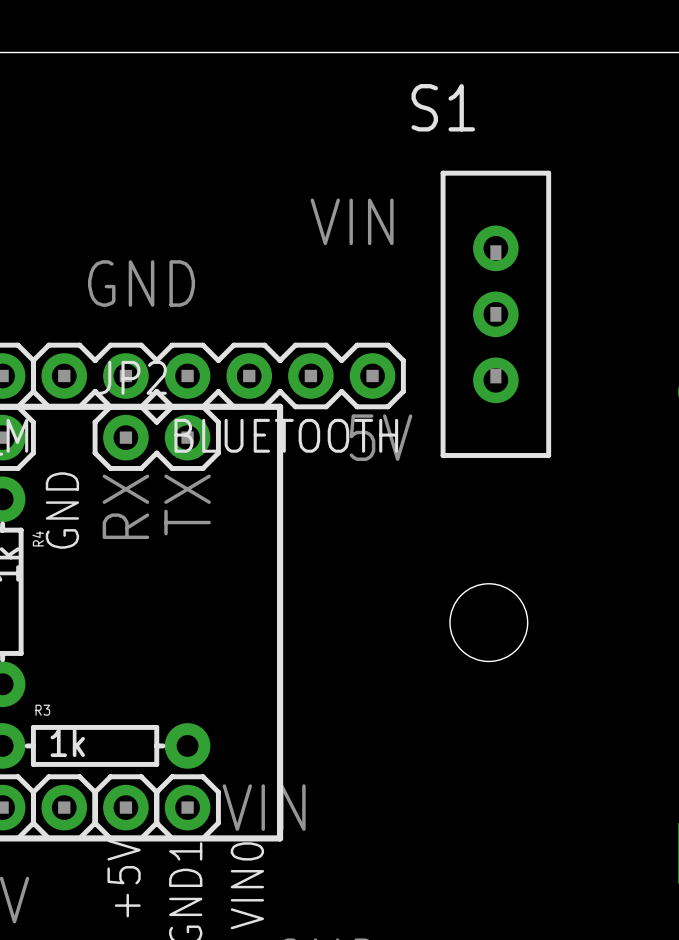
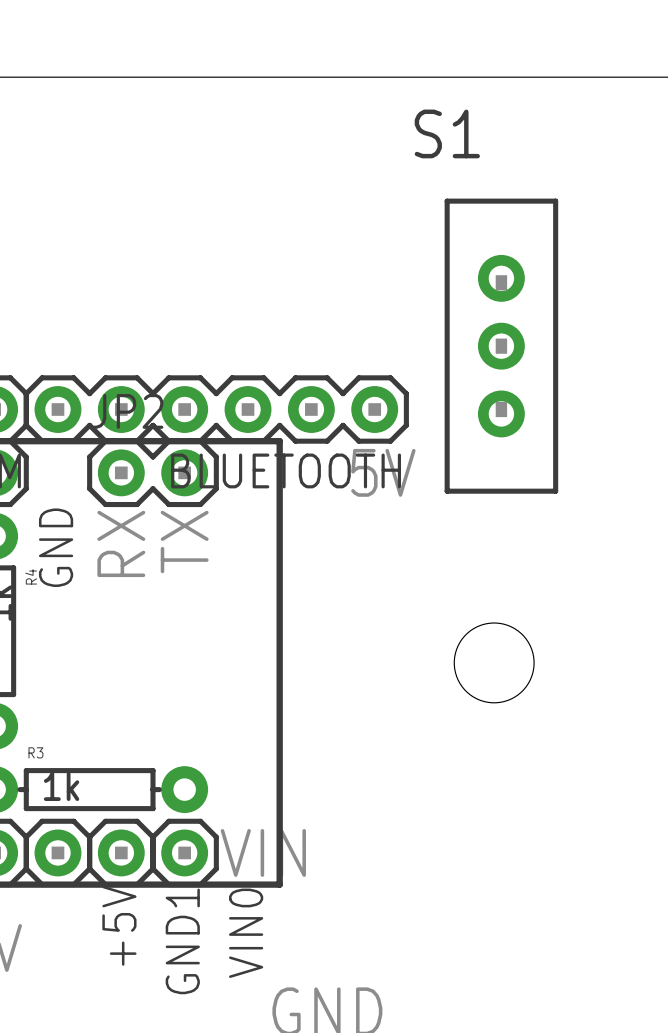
text: VIN (352, 221) -> none
text: GND (141, 283) -> none

